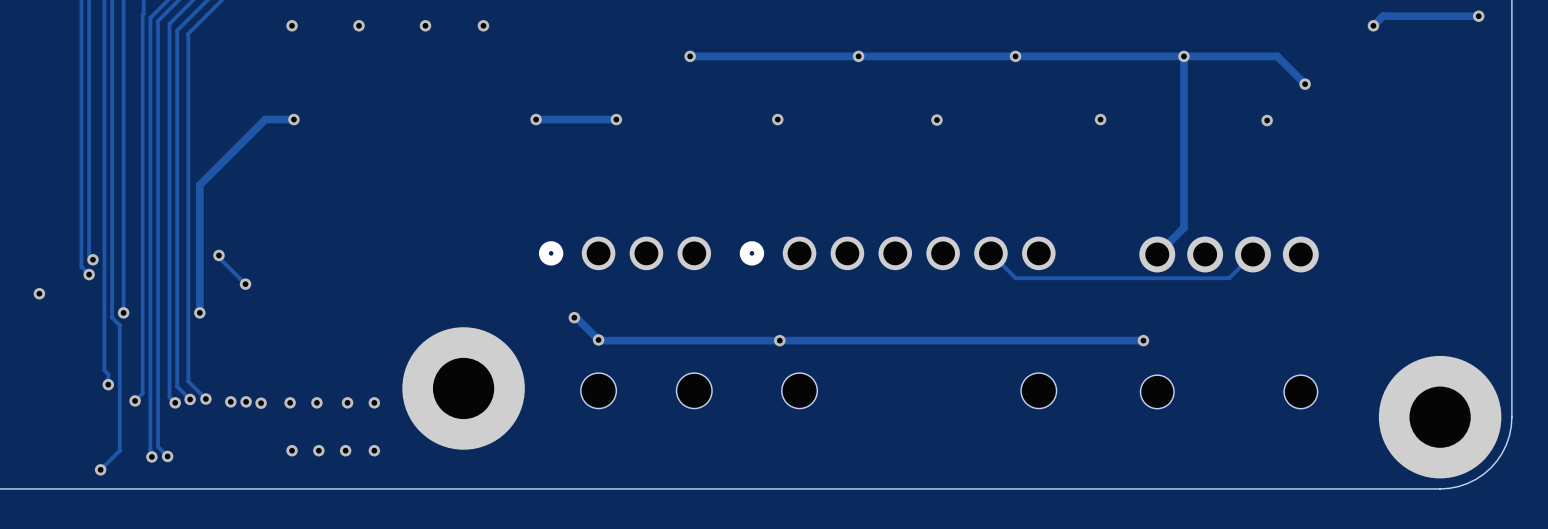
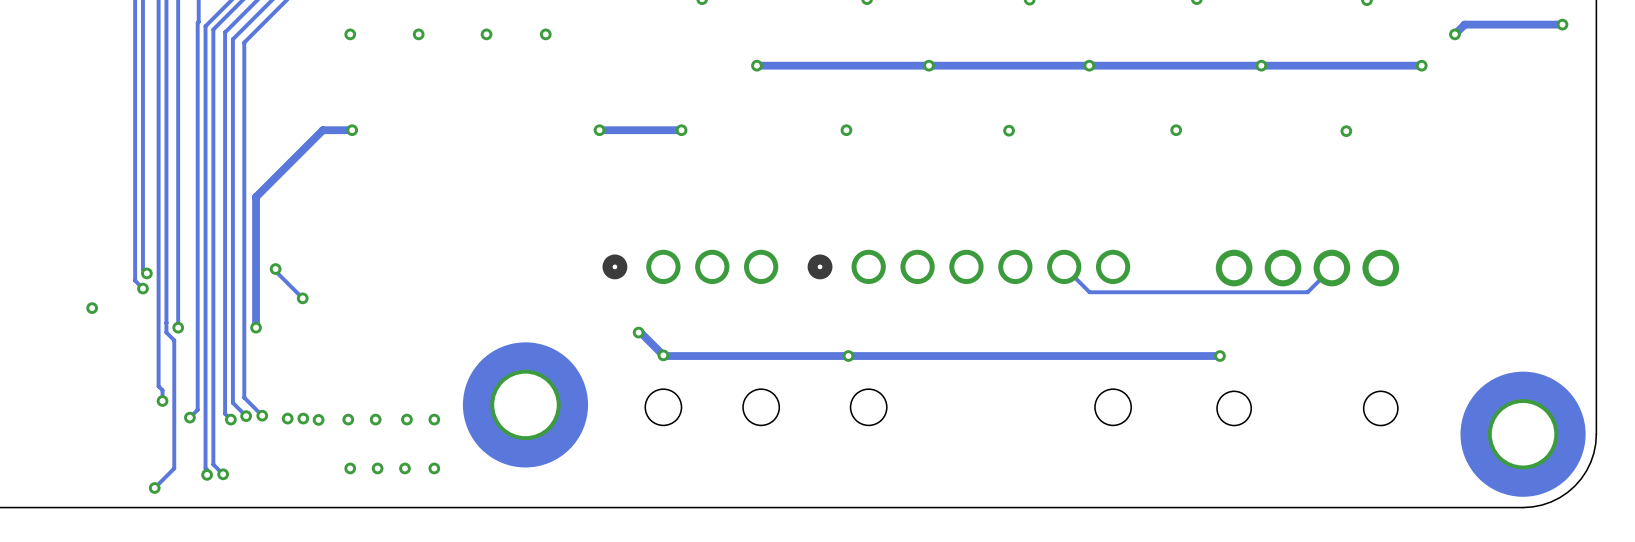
track: (1183, 56) (1183, 227) (1157, 254) -> none
track: (1277, 56) (1305, 84) -> (1356, 65) (1421, 65)
via position: (1305, 84) -> (1421, 65)

